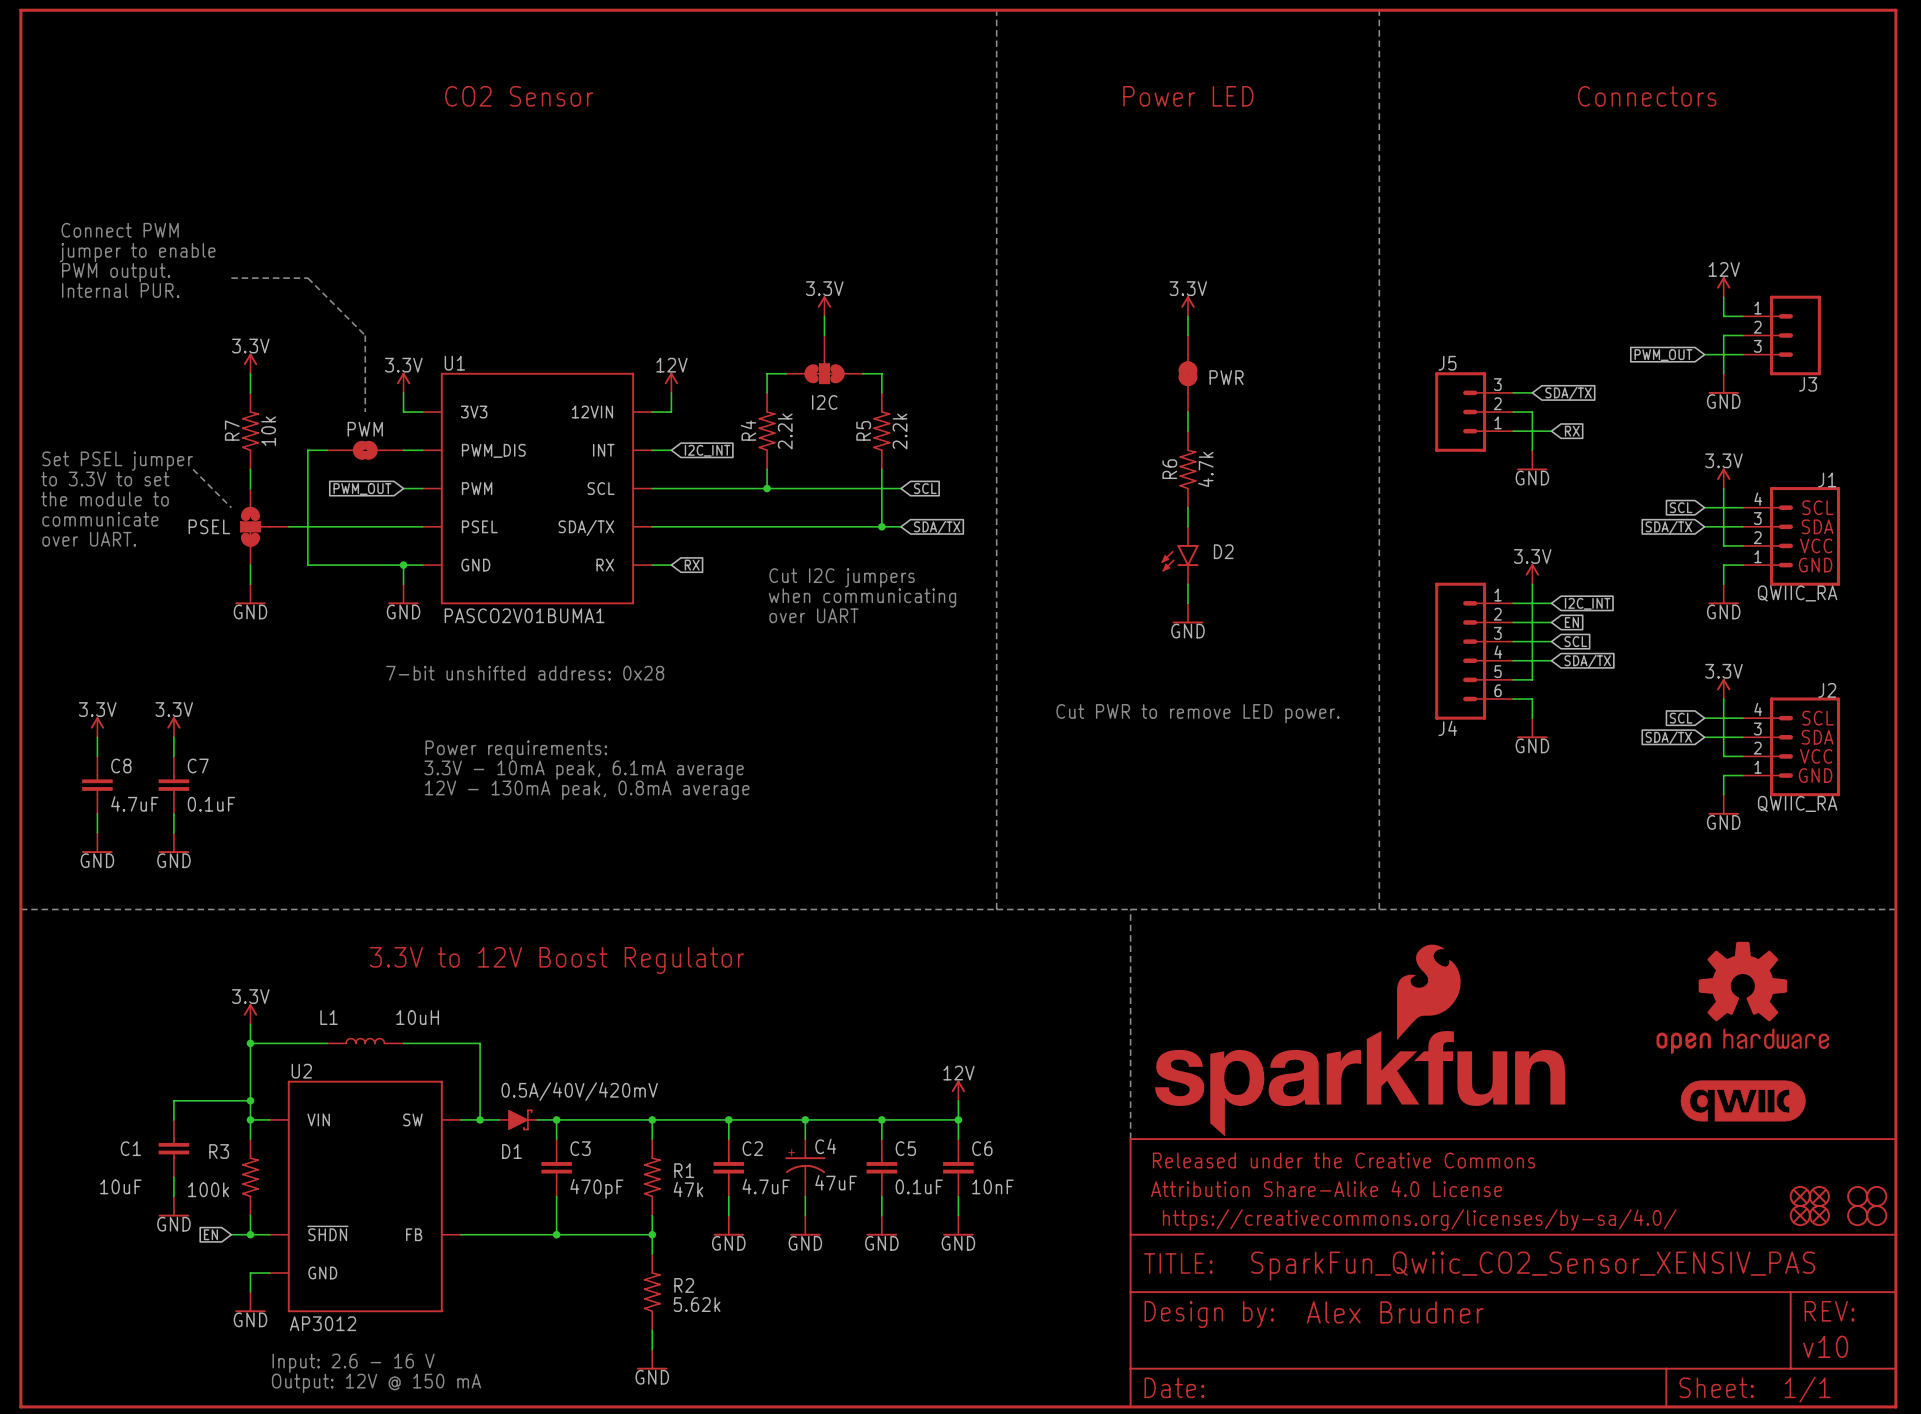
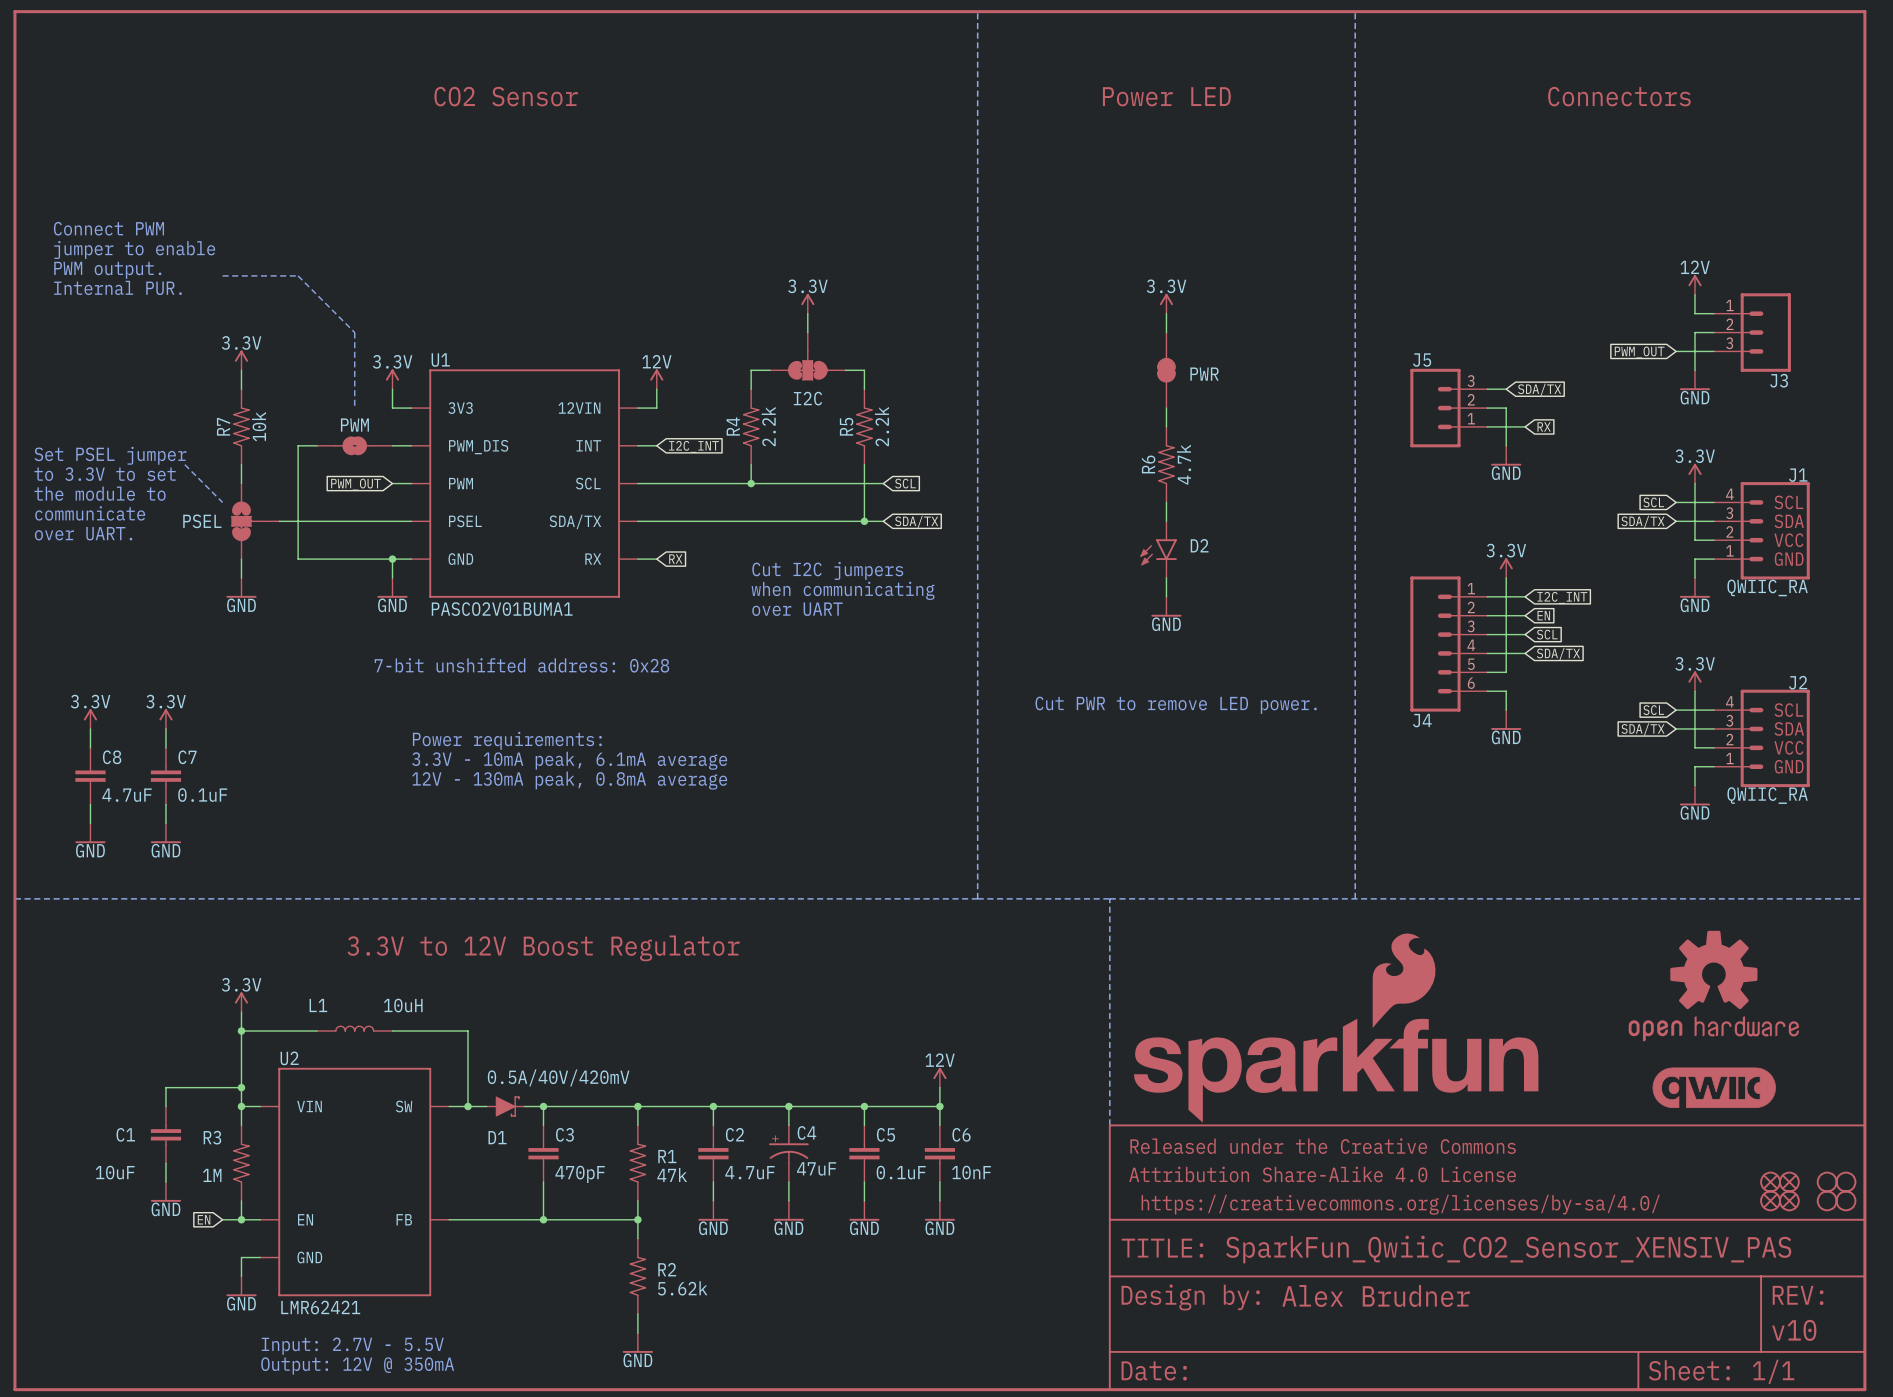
R3 value: 100k (208, 1189) -> 1M (212, 1175)
U2 pin name: ~{SHDN} (327, 1233) -> EN (305, 1219)
U2 text: AP3012 (323, 1323) -> none
U2 value: none -> LMR62421 (320, 1307)
text: Input: 2.6 - 16 V (353, 1363) -> Input: 2.7V - 5.5V (352, 1346)
text: Output: 12V @ 150 mA (376, 1383) -> Output: 12V @ 350mA (357, 1365)

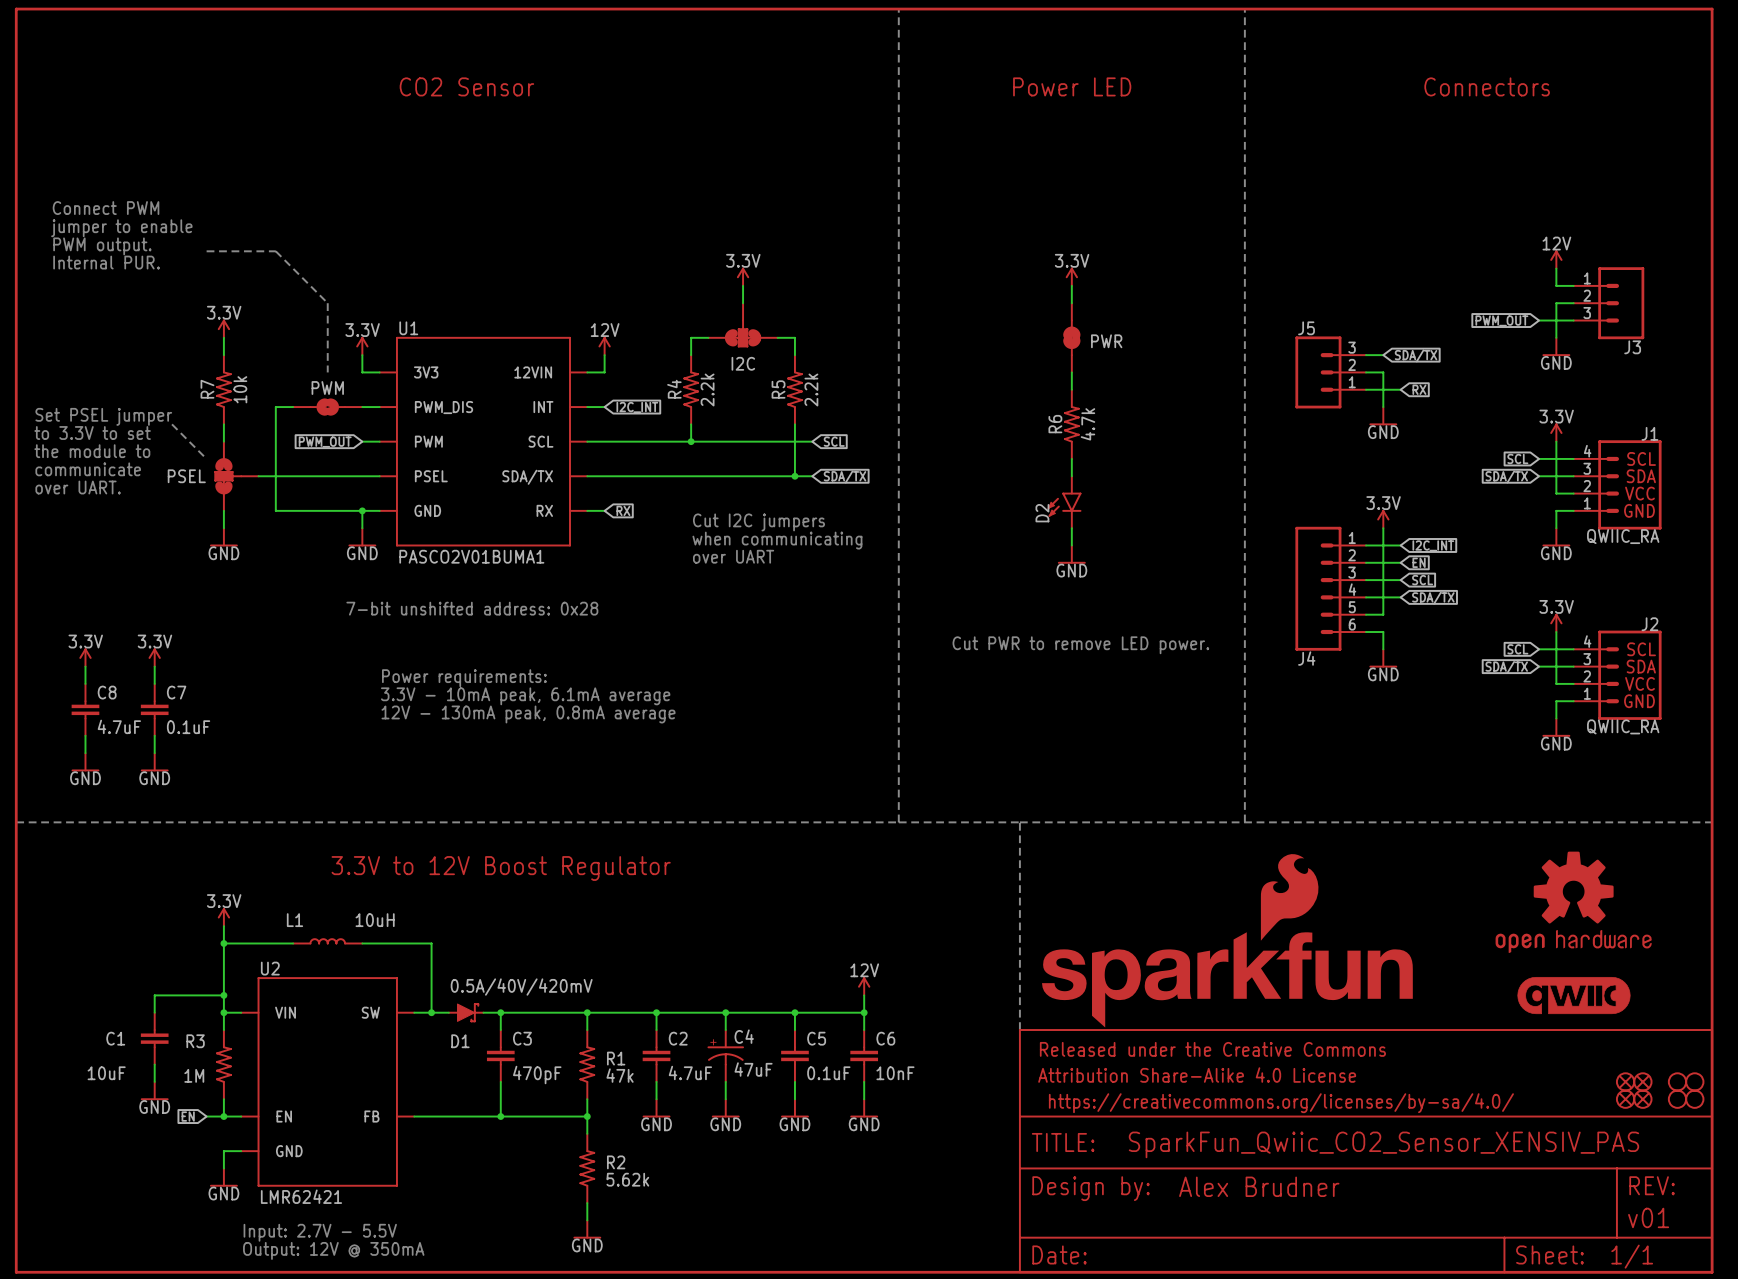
D2 name rotation: 0° (1199, 545) -> 90° counterclockwise (1042, 513)
D2 name position: D2 (1199, 545) -> D2 (1042, 513)
part text: v10 (1794, 1330) -> v01 (1648, 1217)

